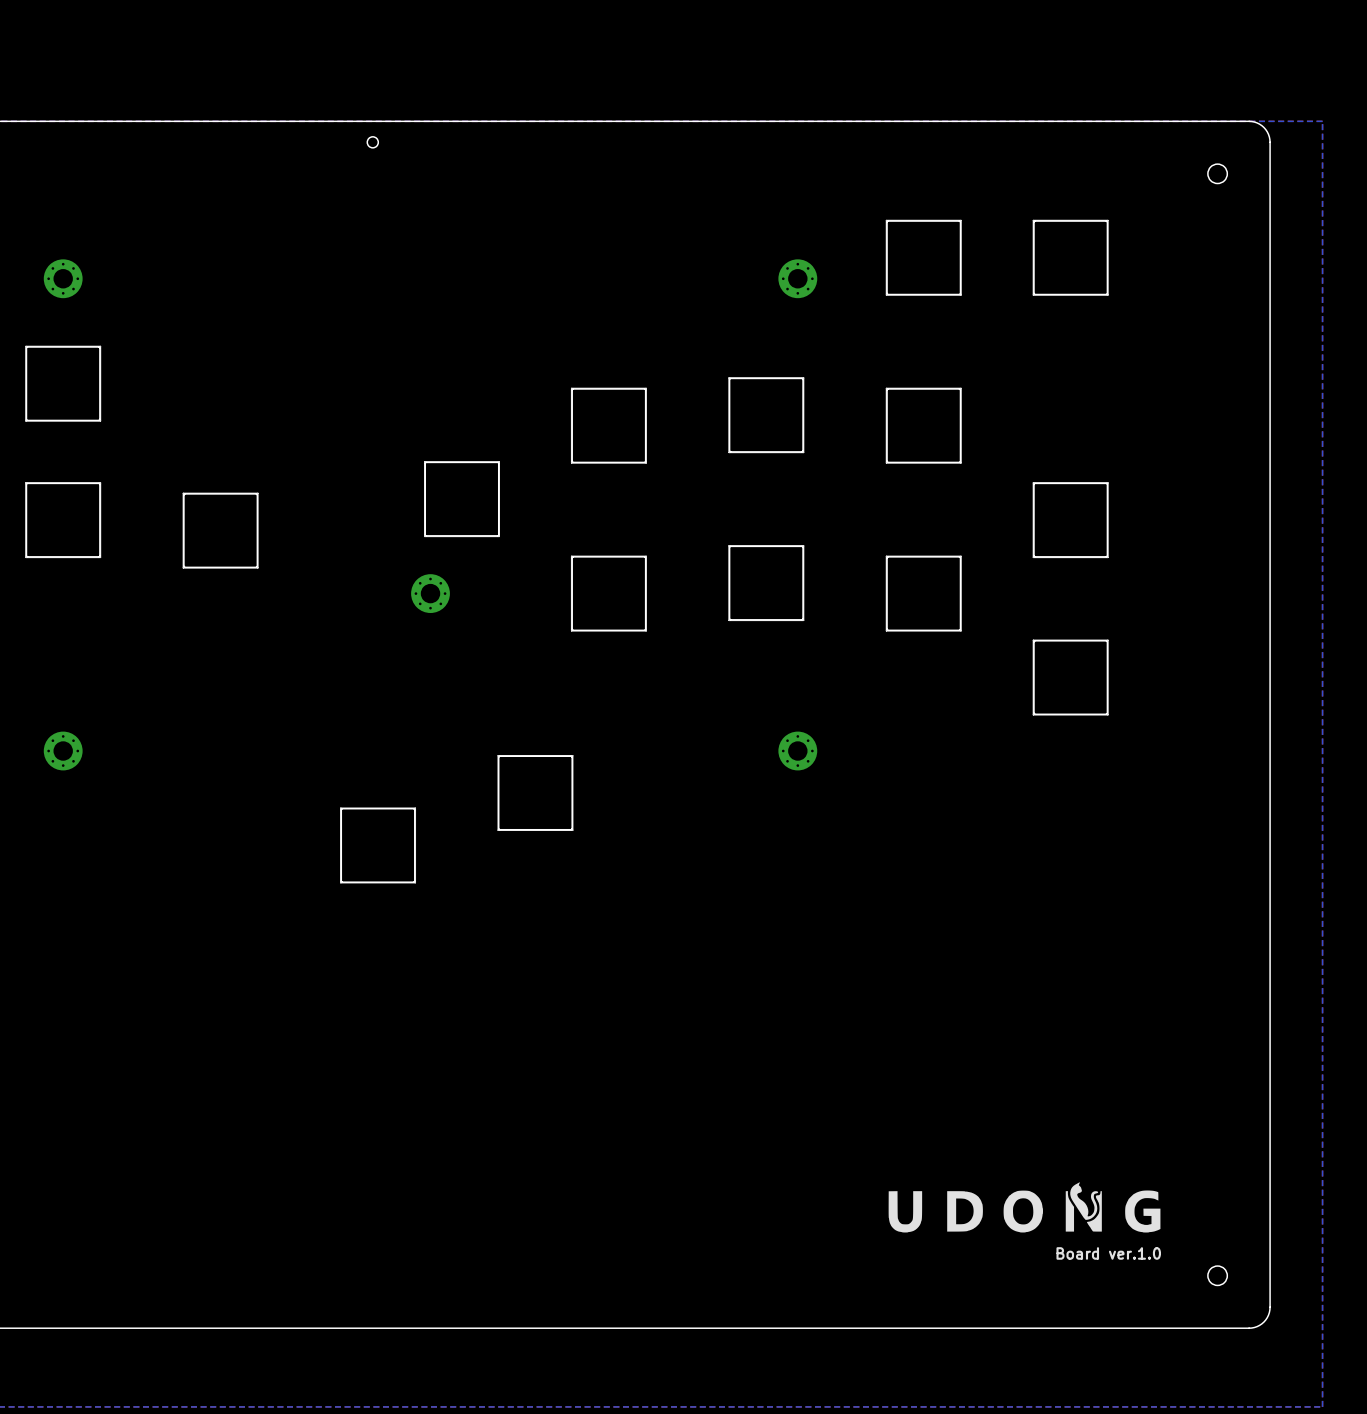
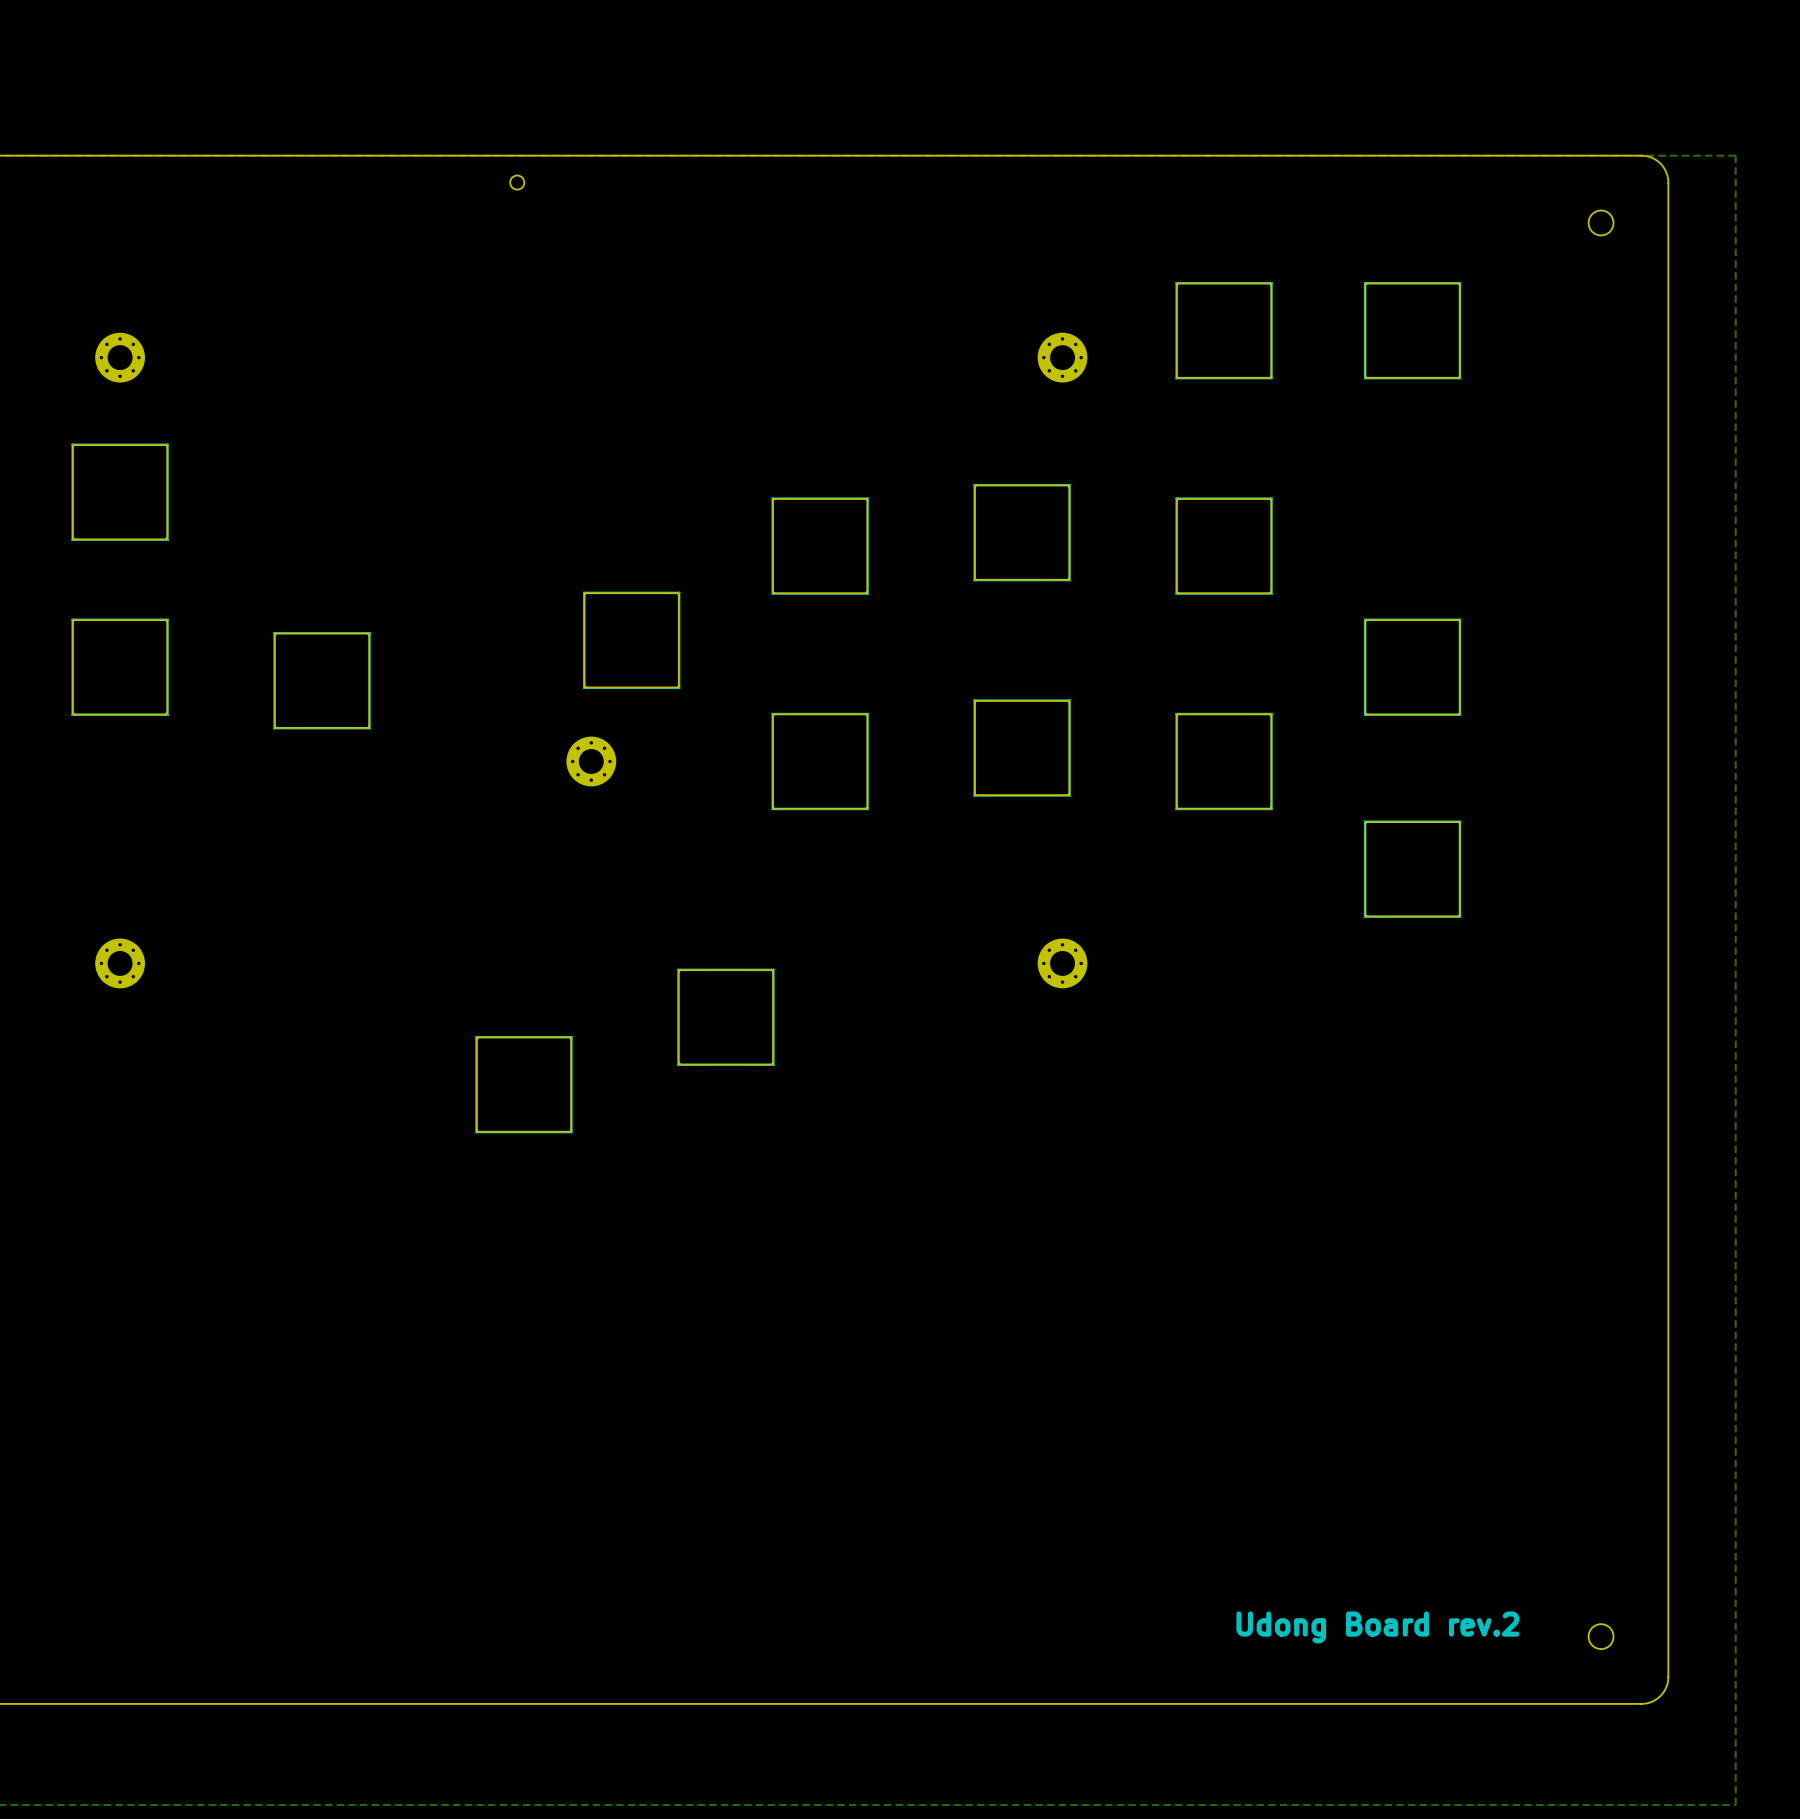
drawing: [888, 1182, 1161, 1233] -> none
text: Board ver.1.0 (1108, 1253) -> none
text: none -> Udong Board rev.2 (1377, 1627)

